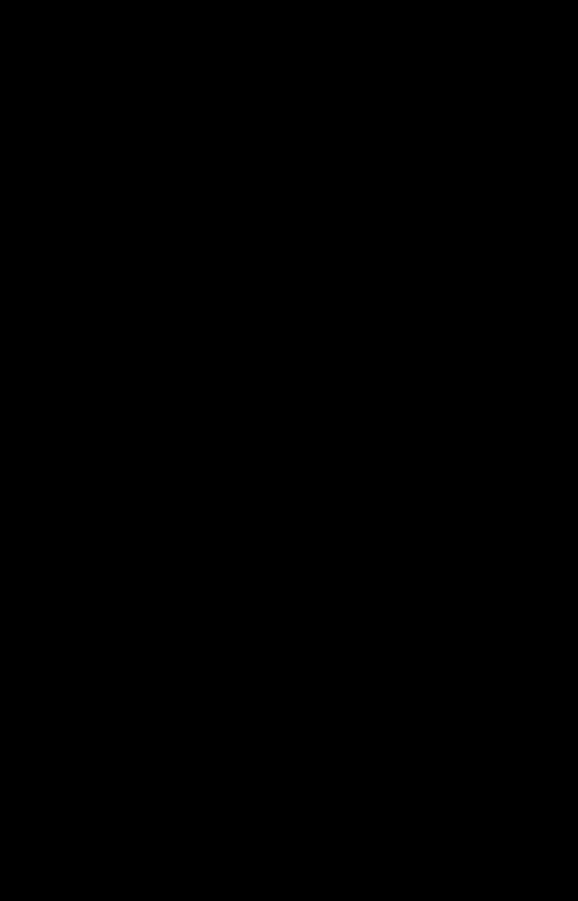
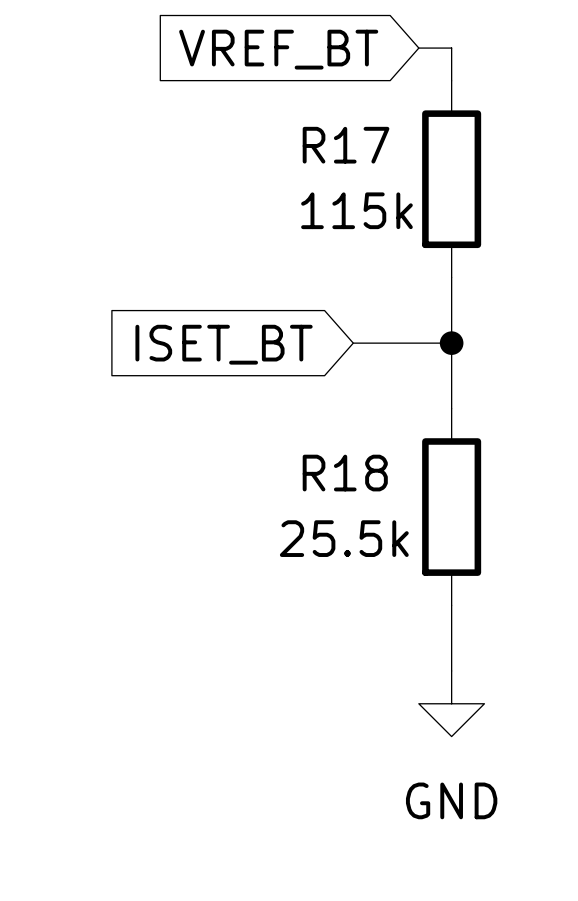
wire: none -> (418, 48) (451, 48) (451, 80)
global label: none -> VREF_BT (278, 49)
R17: none -> 115k (451, 179)
wire: none -> (451, 277) (451, 408)
wire: none -> (353, 343) (451, 343)
junction: none -> (451, 343)
global label: none -> ISET_BT (224, 344)
R18: none -> 25.5k (451, 507)
wire: none -> (451, 605) (451, 670)
power symbol: none -> GND (451, 703)

